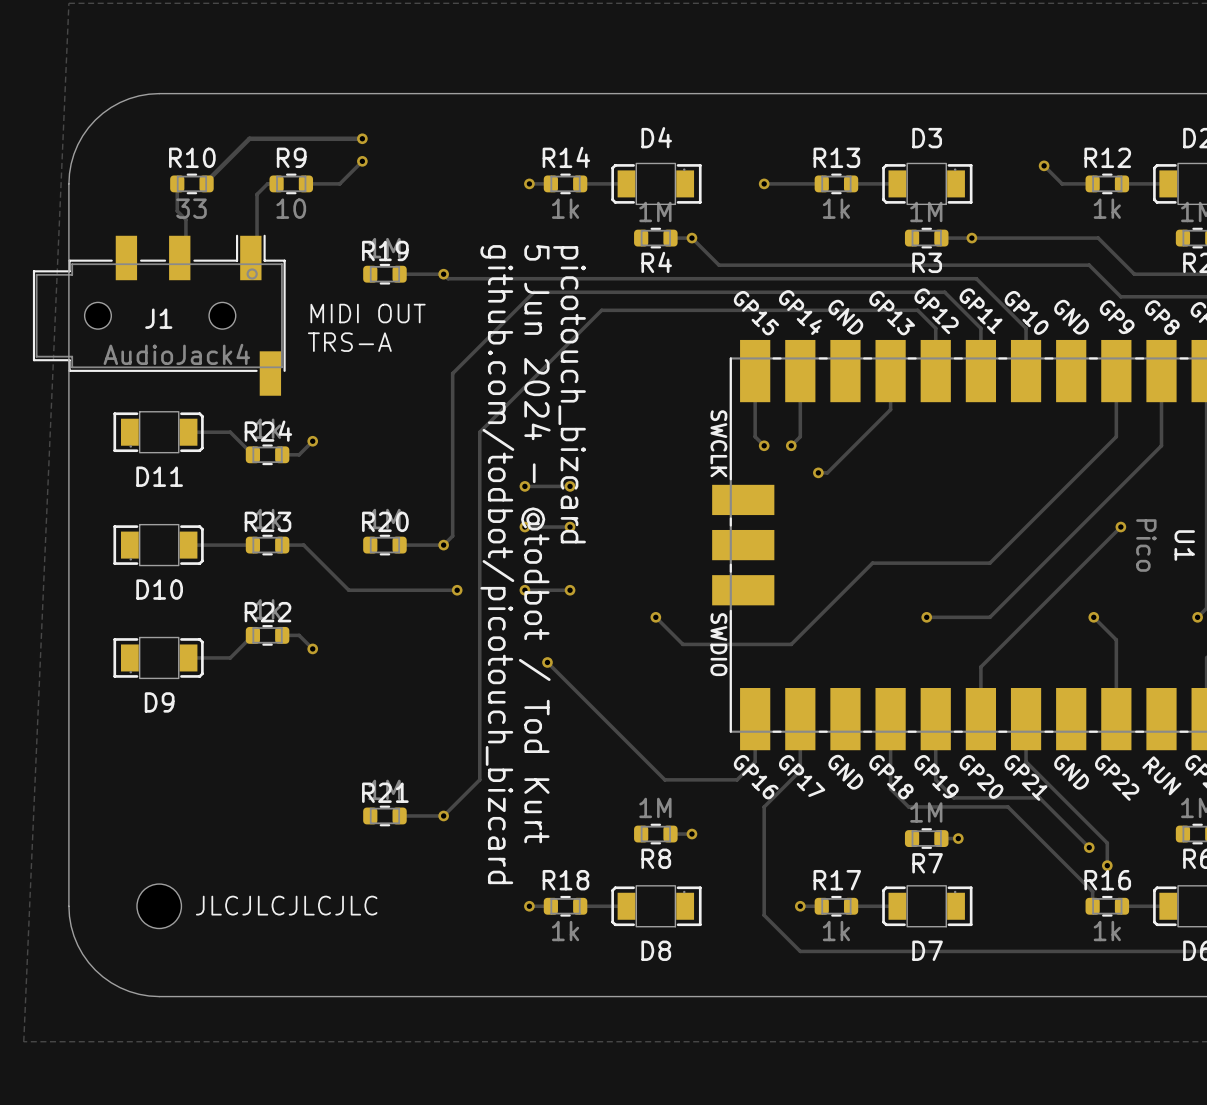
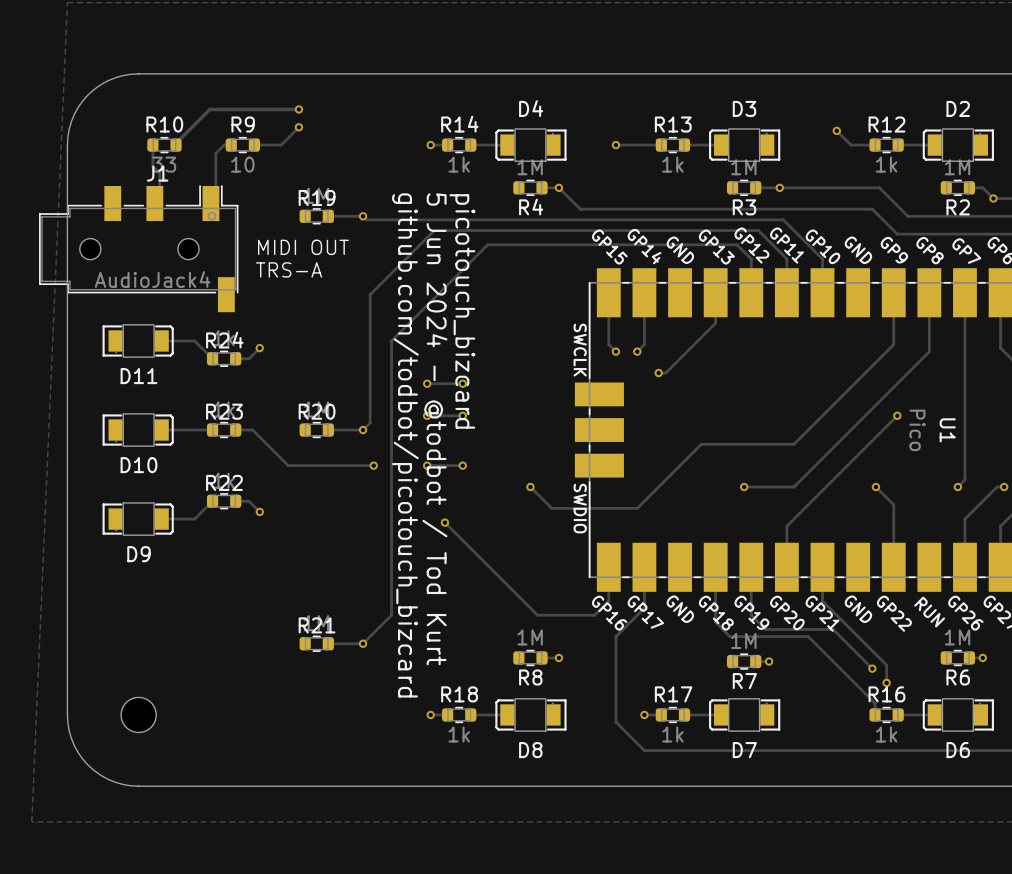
J1 name position: J1 (158, 318) -> J1 (157, 173)
text: JLCJLCJLCJLC (286, 905) -> none

